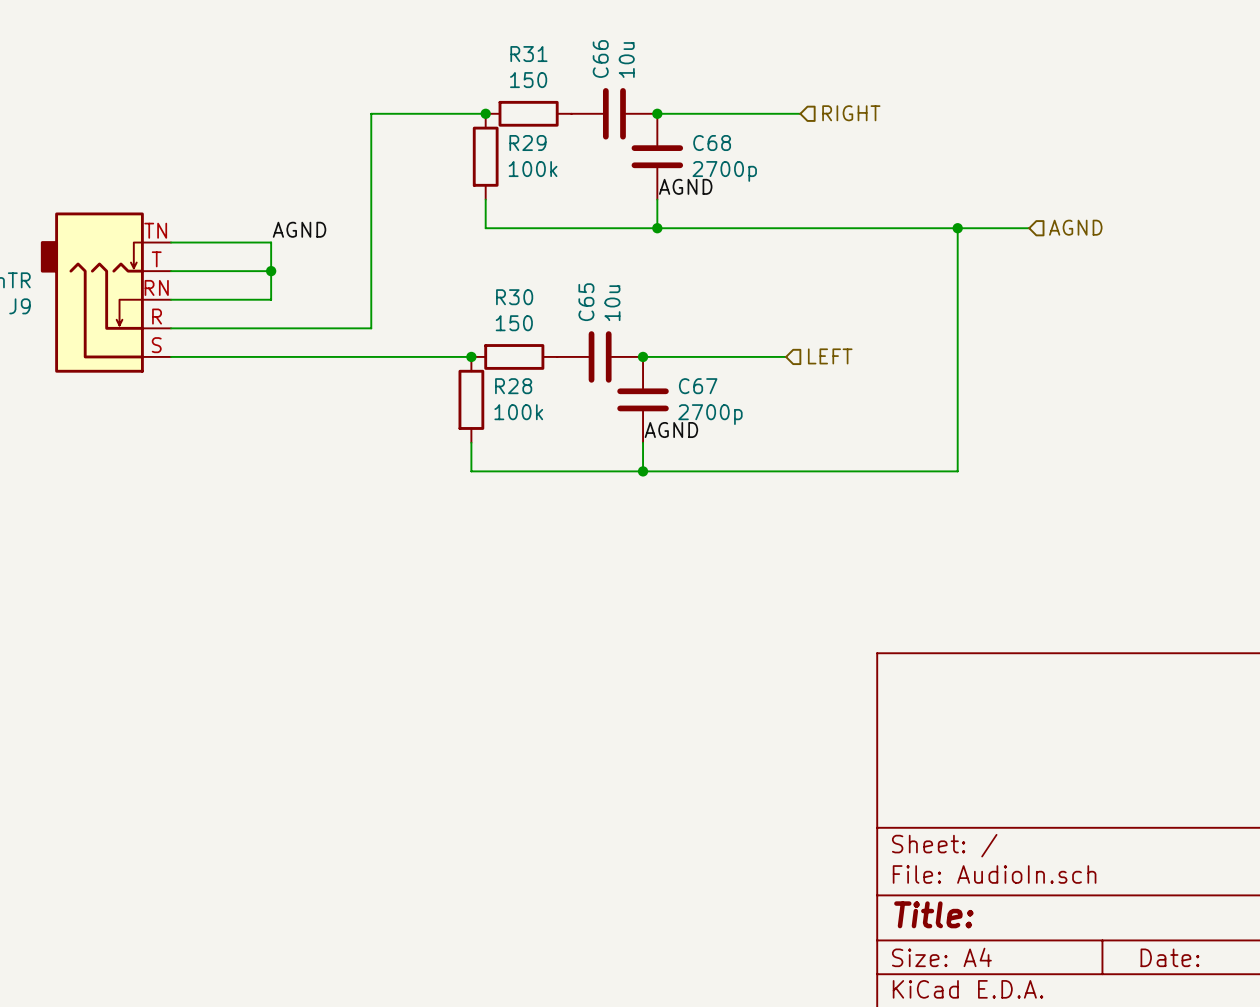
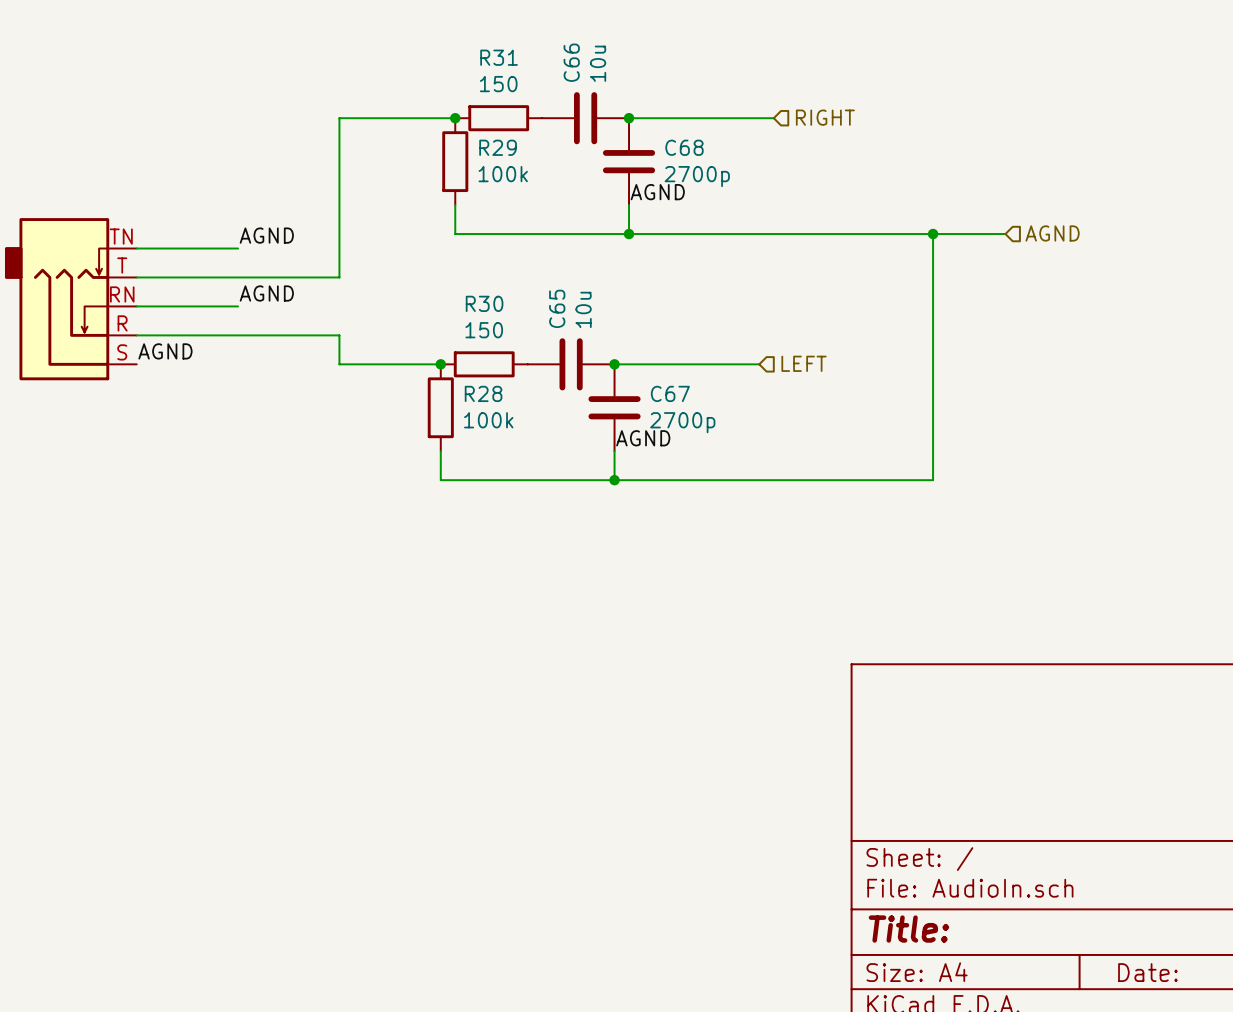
wire: (271, 242) (271, 299) -> none
wire: none -> (238, 277) (339, 277)
junction: (271, 271) -> none
wire: (371, 271) (371, 328) -> (339, 364) (339, 335)
label: none -> AGND (266, 293)
label: none -> AGND (165, 351)
wire: (171, 356) (371, 356) -> none

